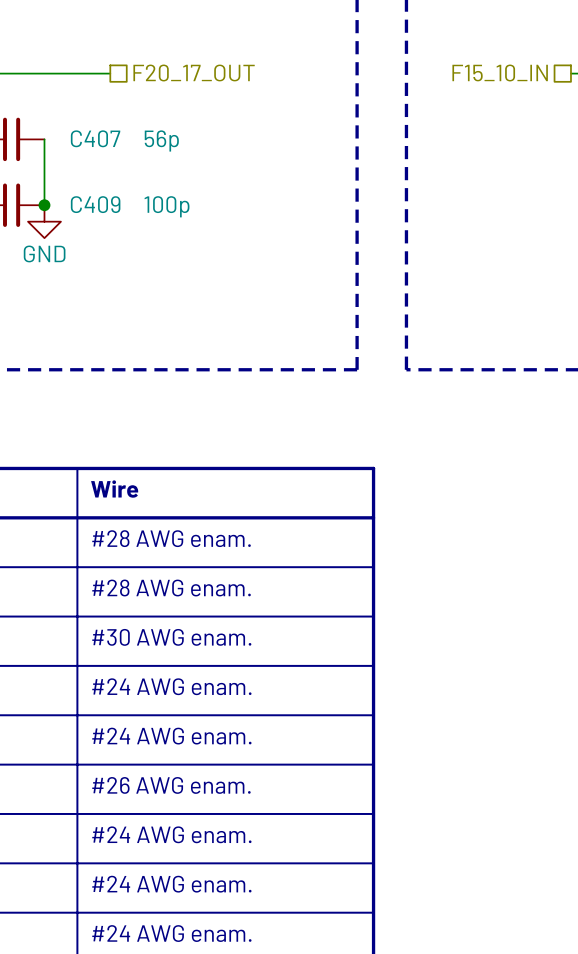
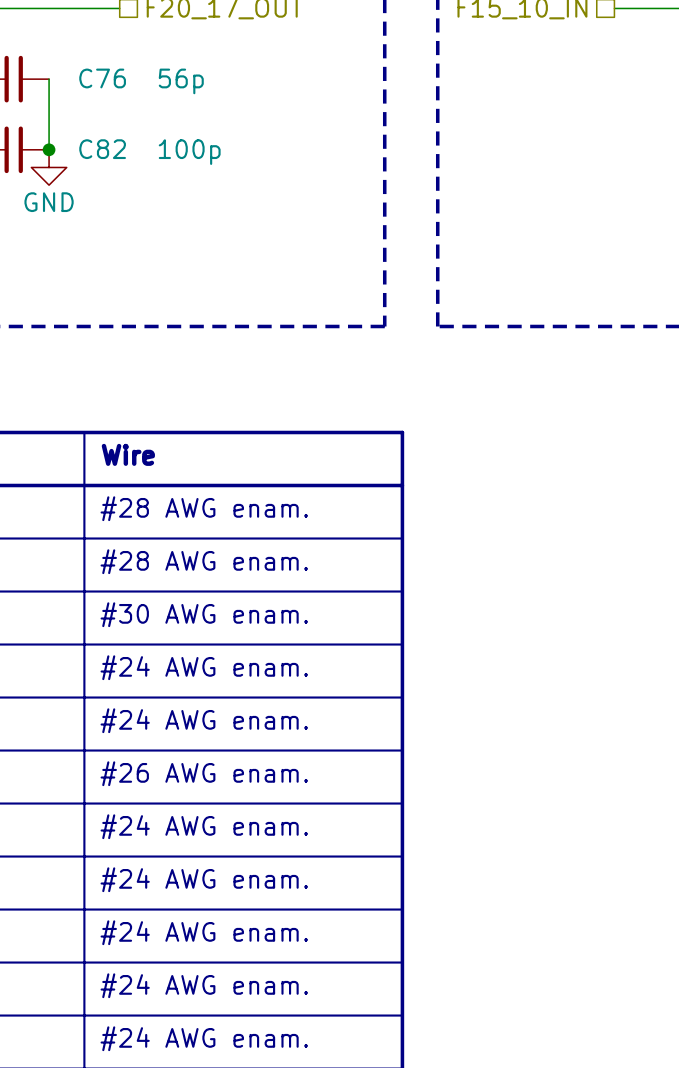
C407 name: C407 (95, 138) -> C76 (102, 78)
C409 name: C409 (95, 204) -> C82 (102, 149)

